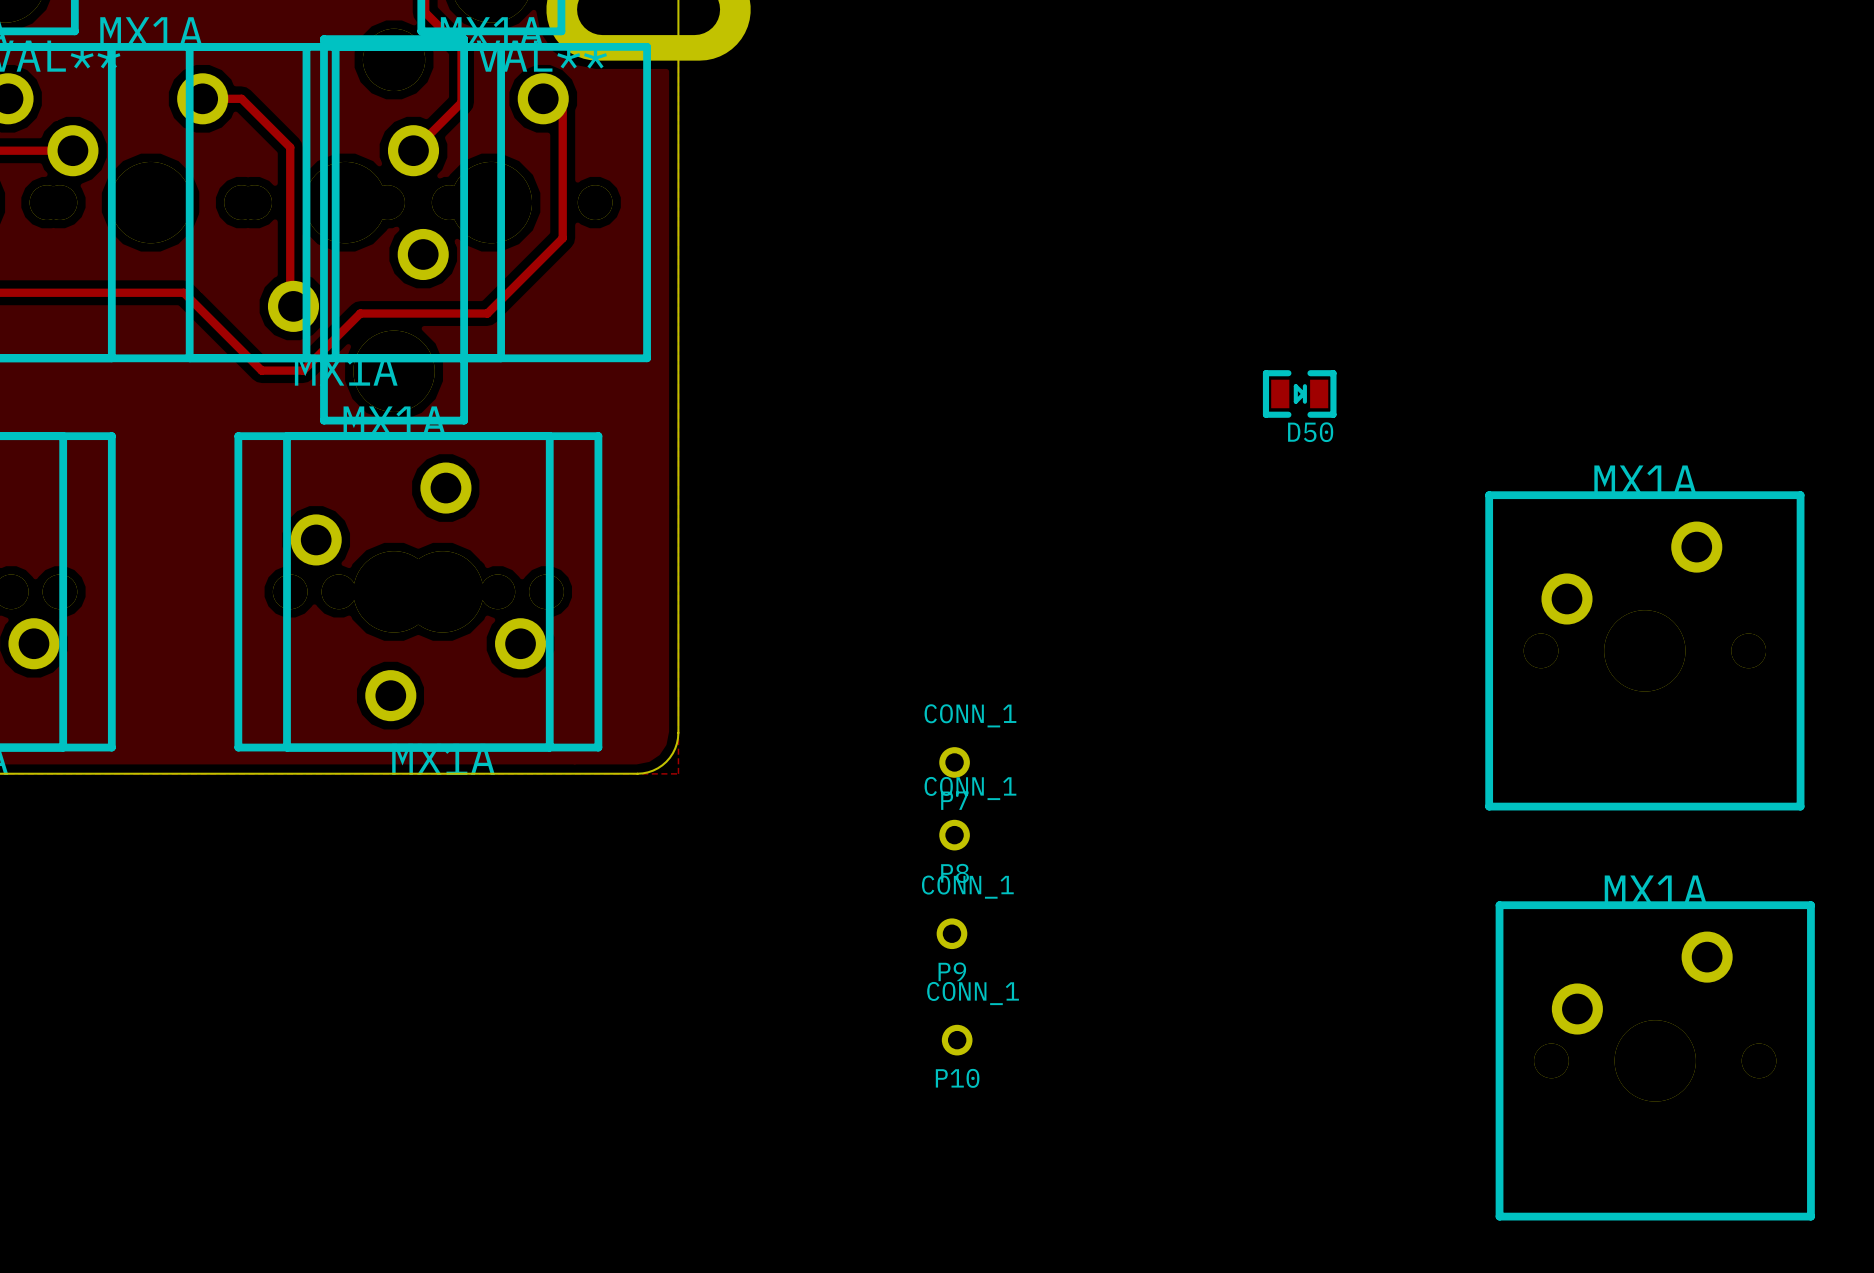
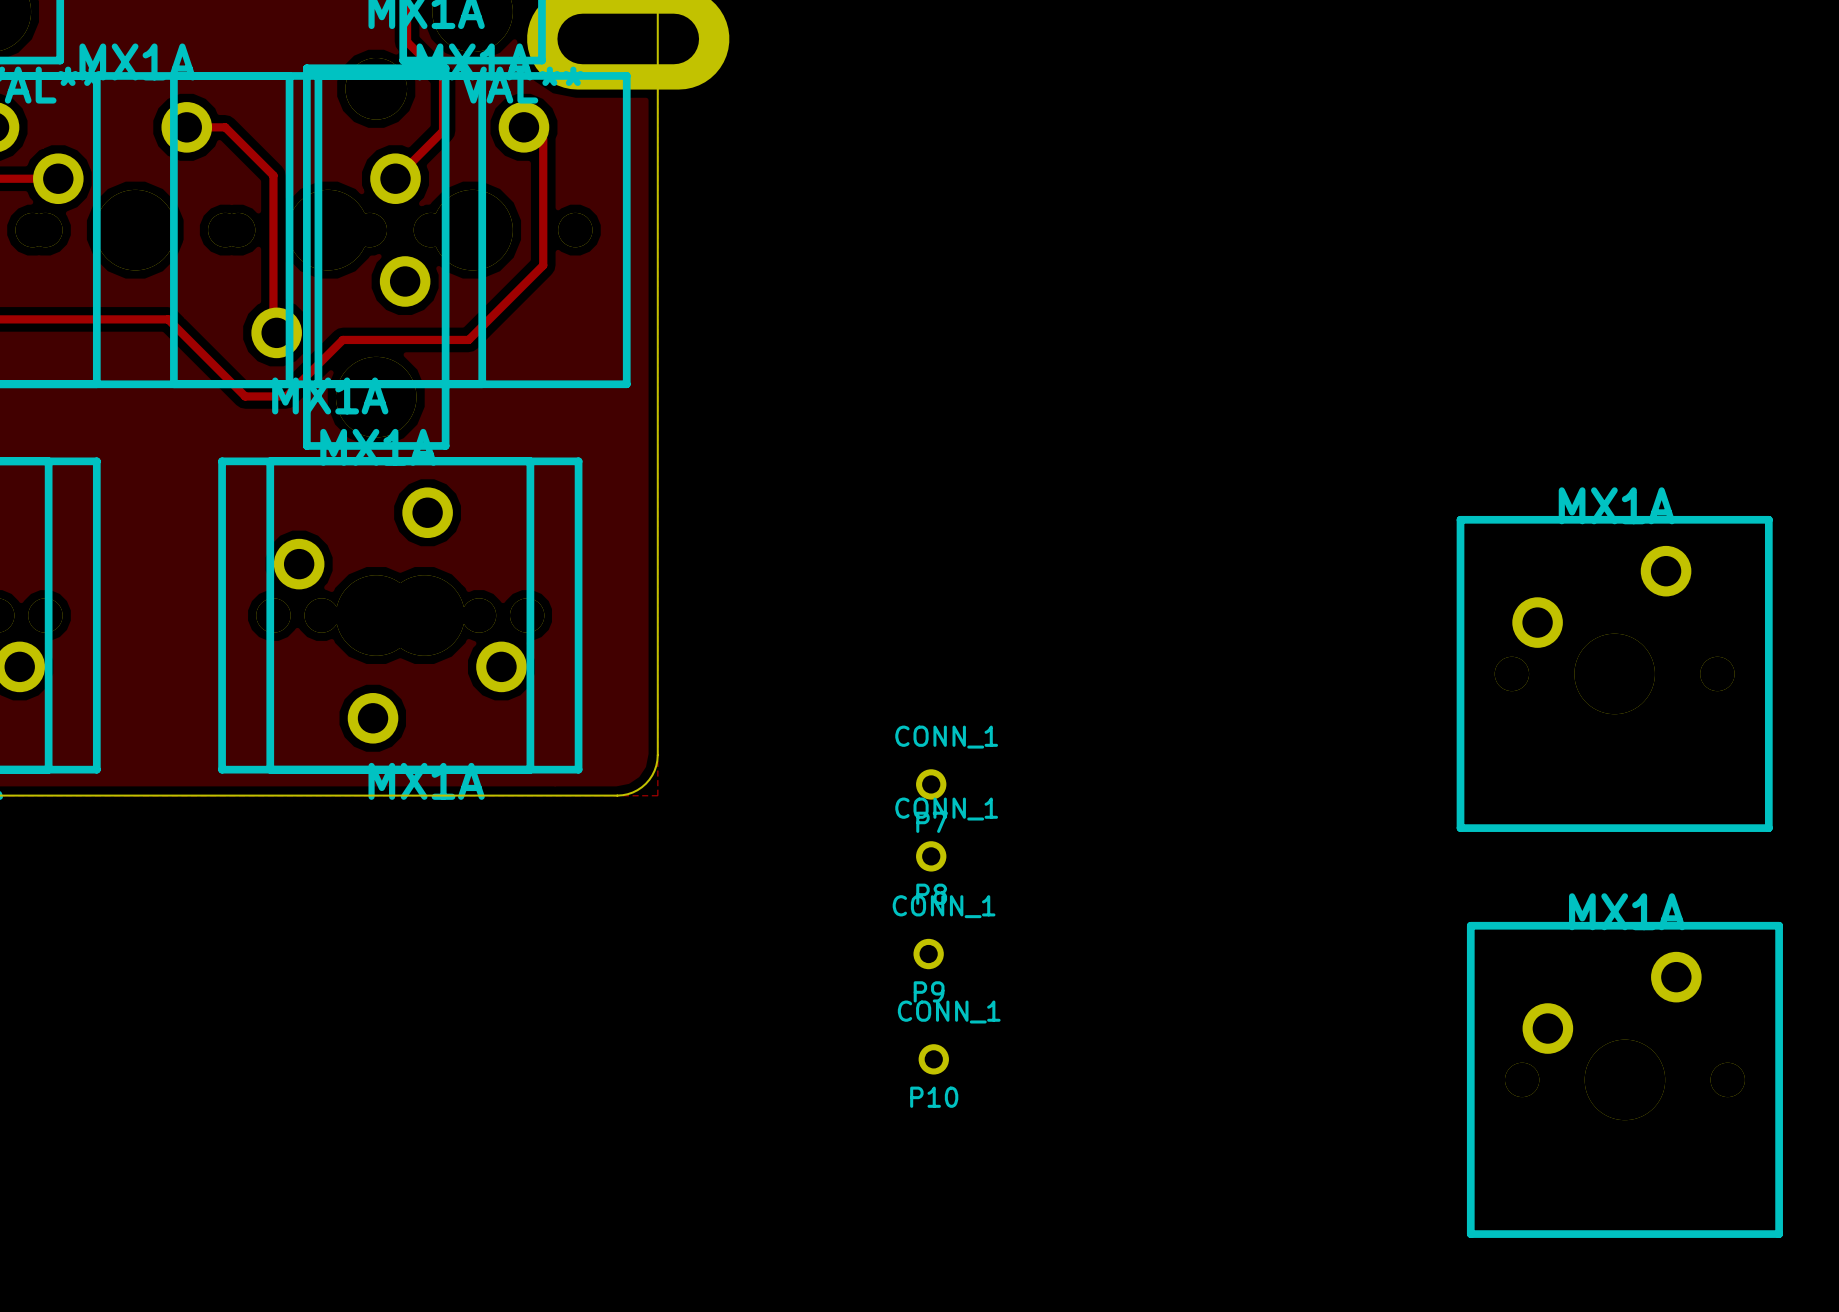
D50: (1299, 393) -> none

